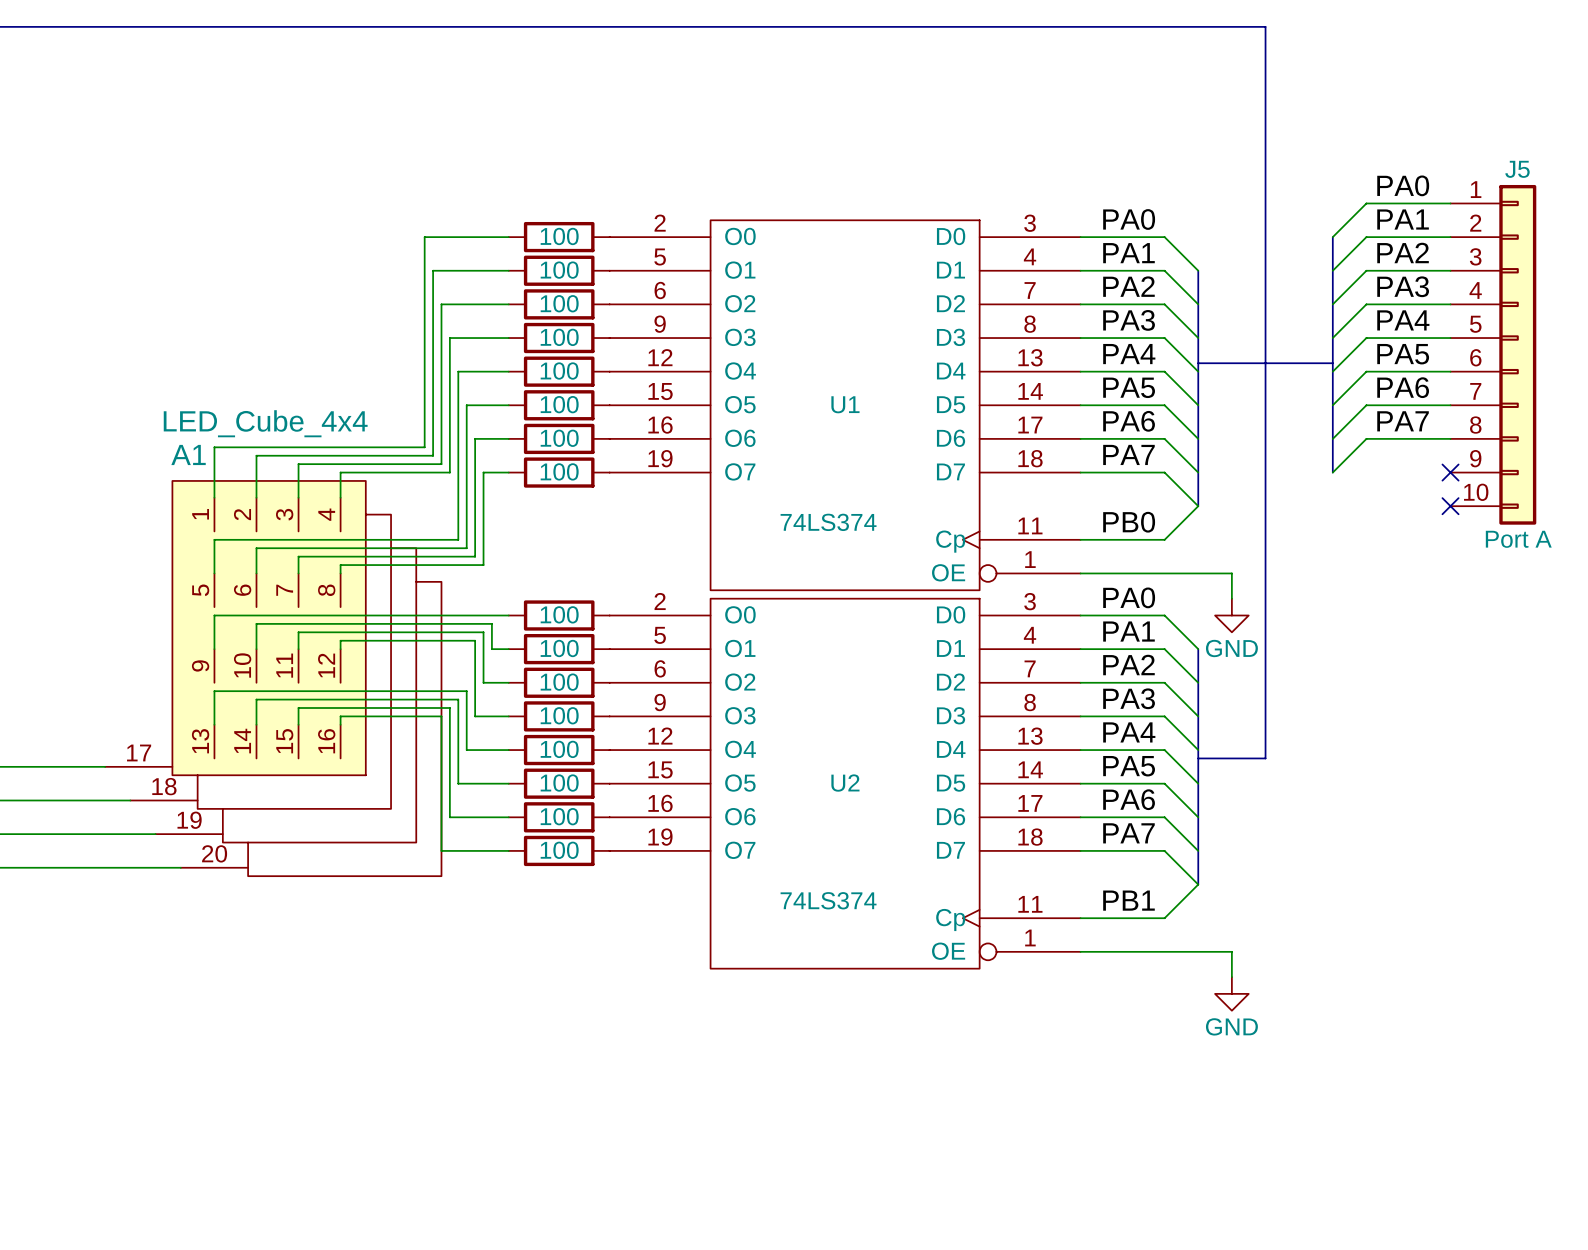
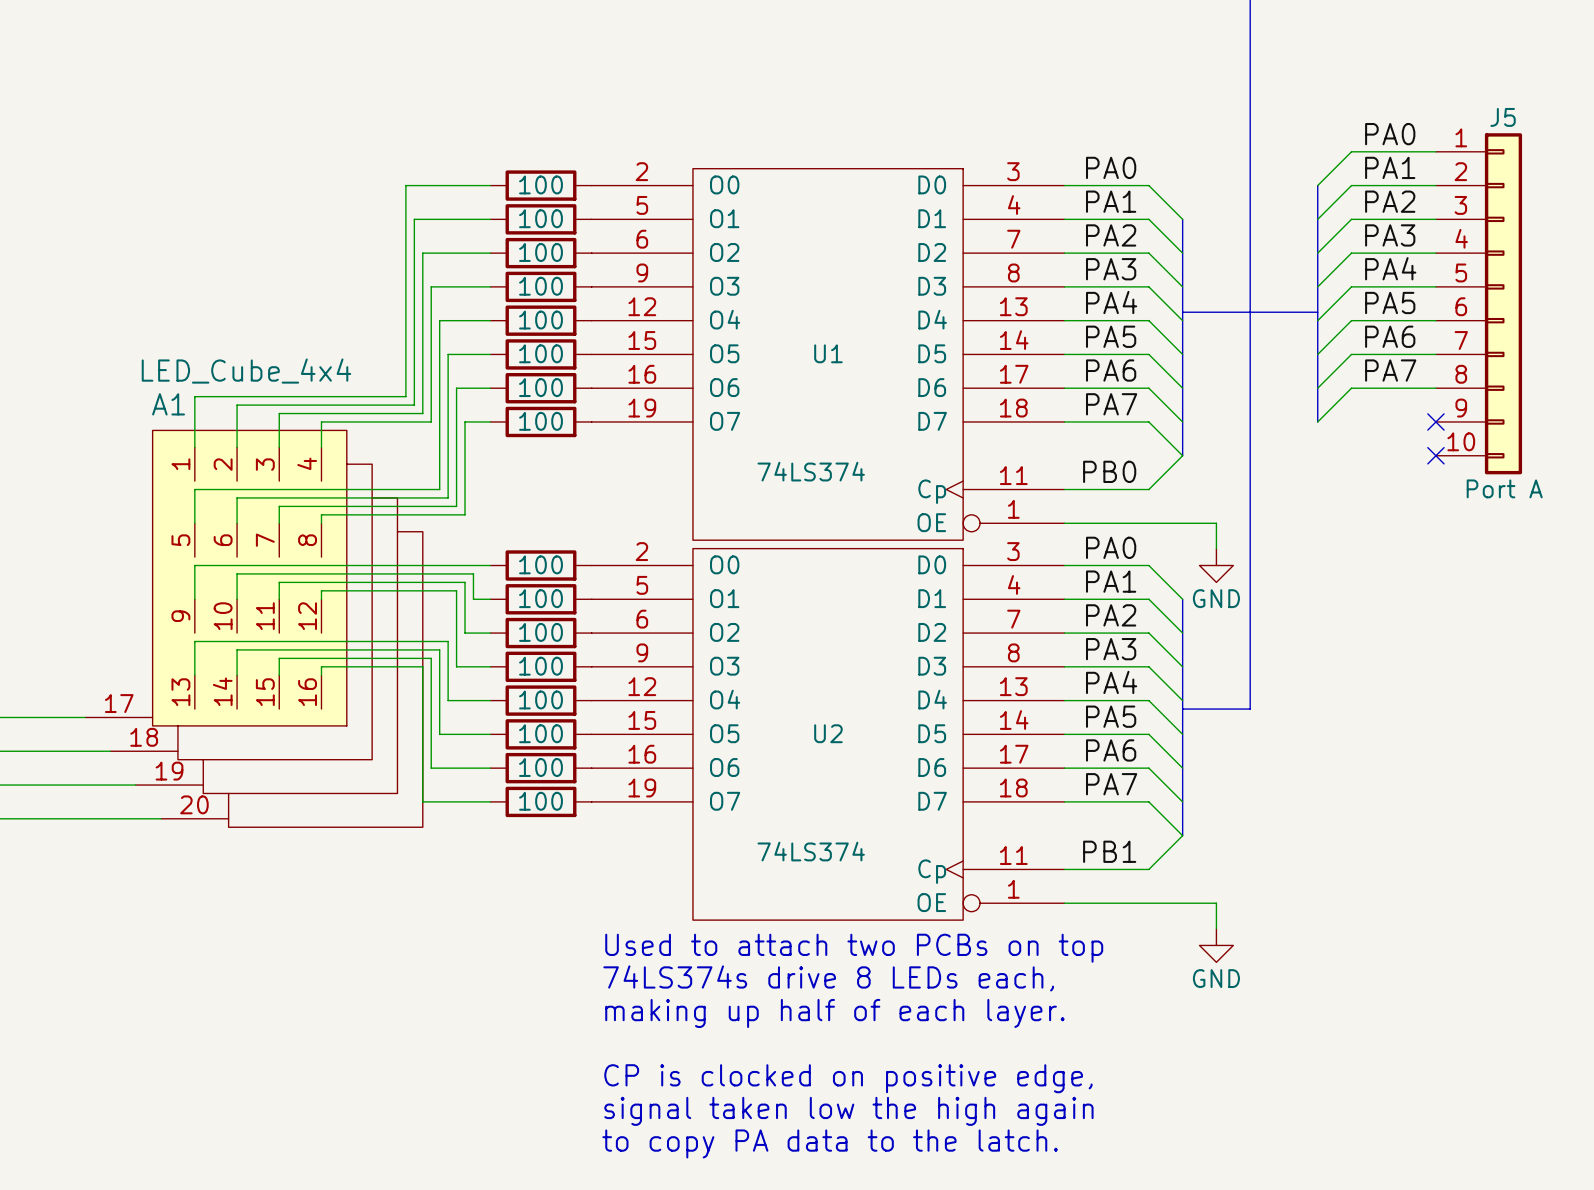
text: none -> Used to attach two PCBs on top (854, 948)
text: none -> 74LS374s drive 8 LEDs each, (828, 978)
text: none -> making up half of each layer. (834, 1013)
text: none -> CP is clocked on positive edge, (848, 1078)
text: none -> signal taken low the high again (848, 1111)
text: none -> to copy PA data to the latch. (830, 1143)

